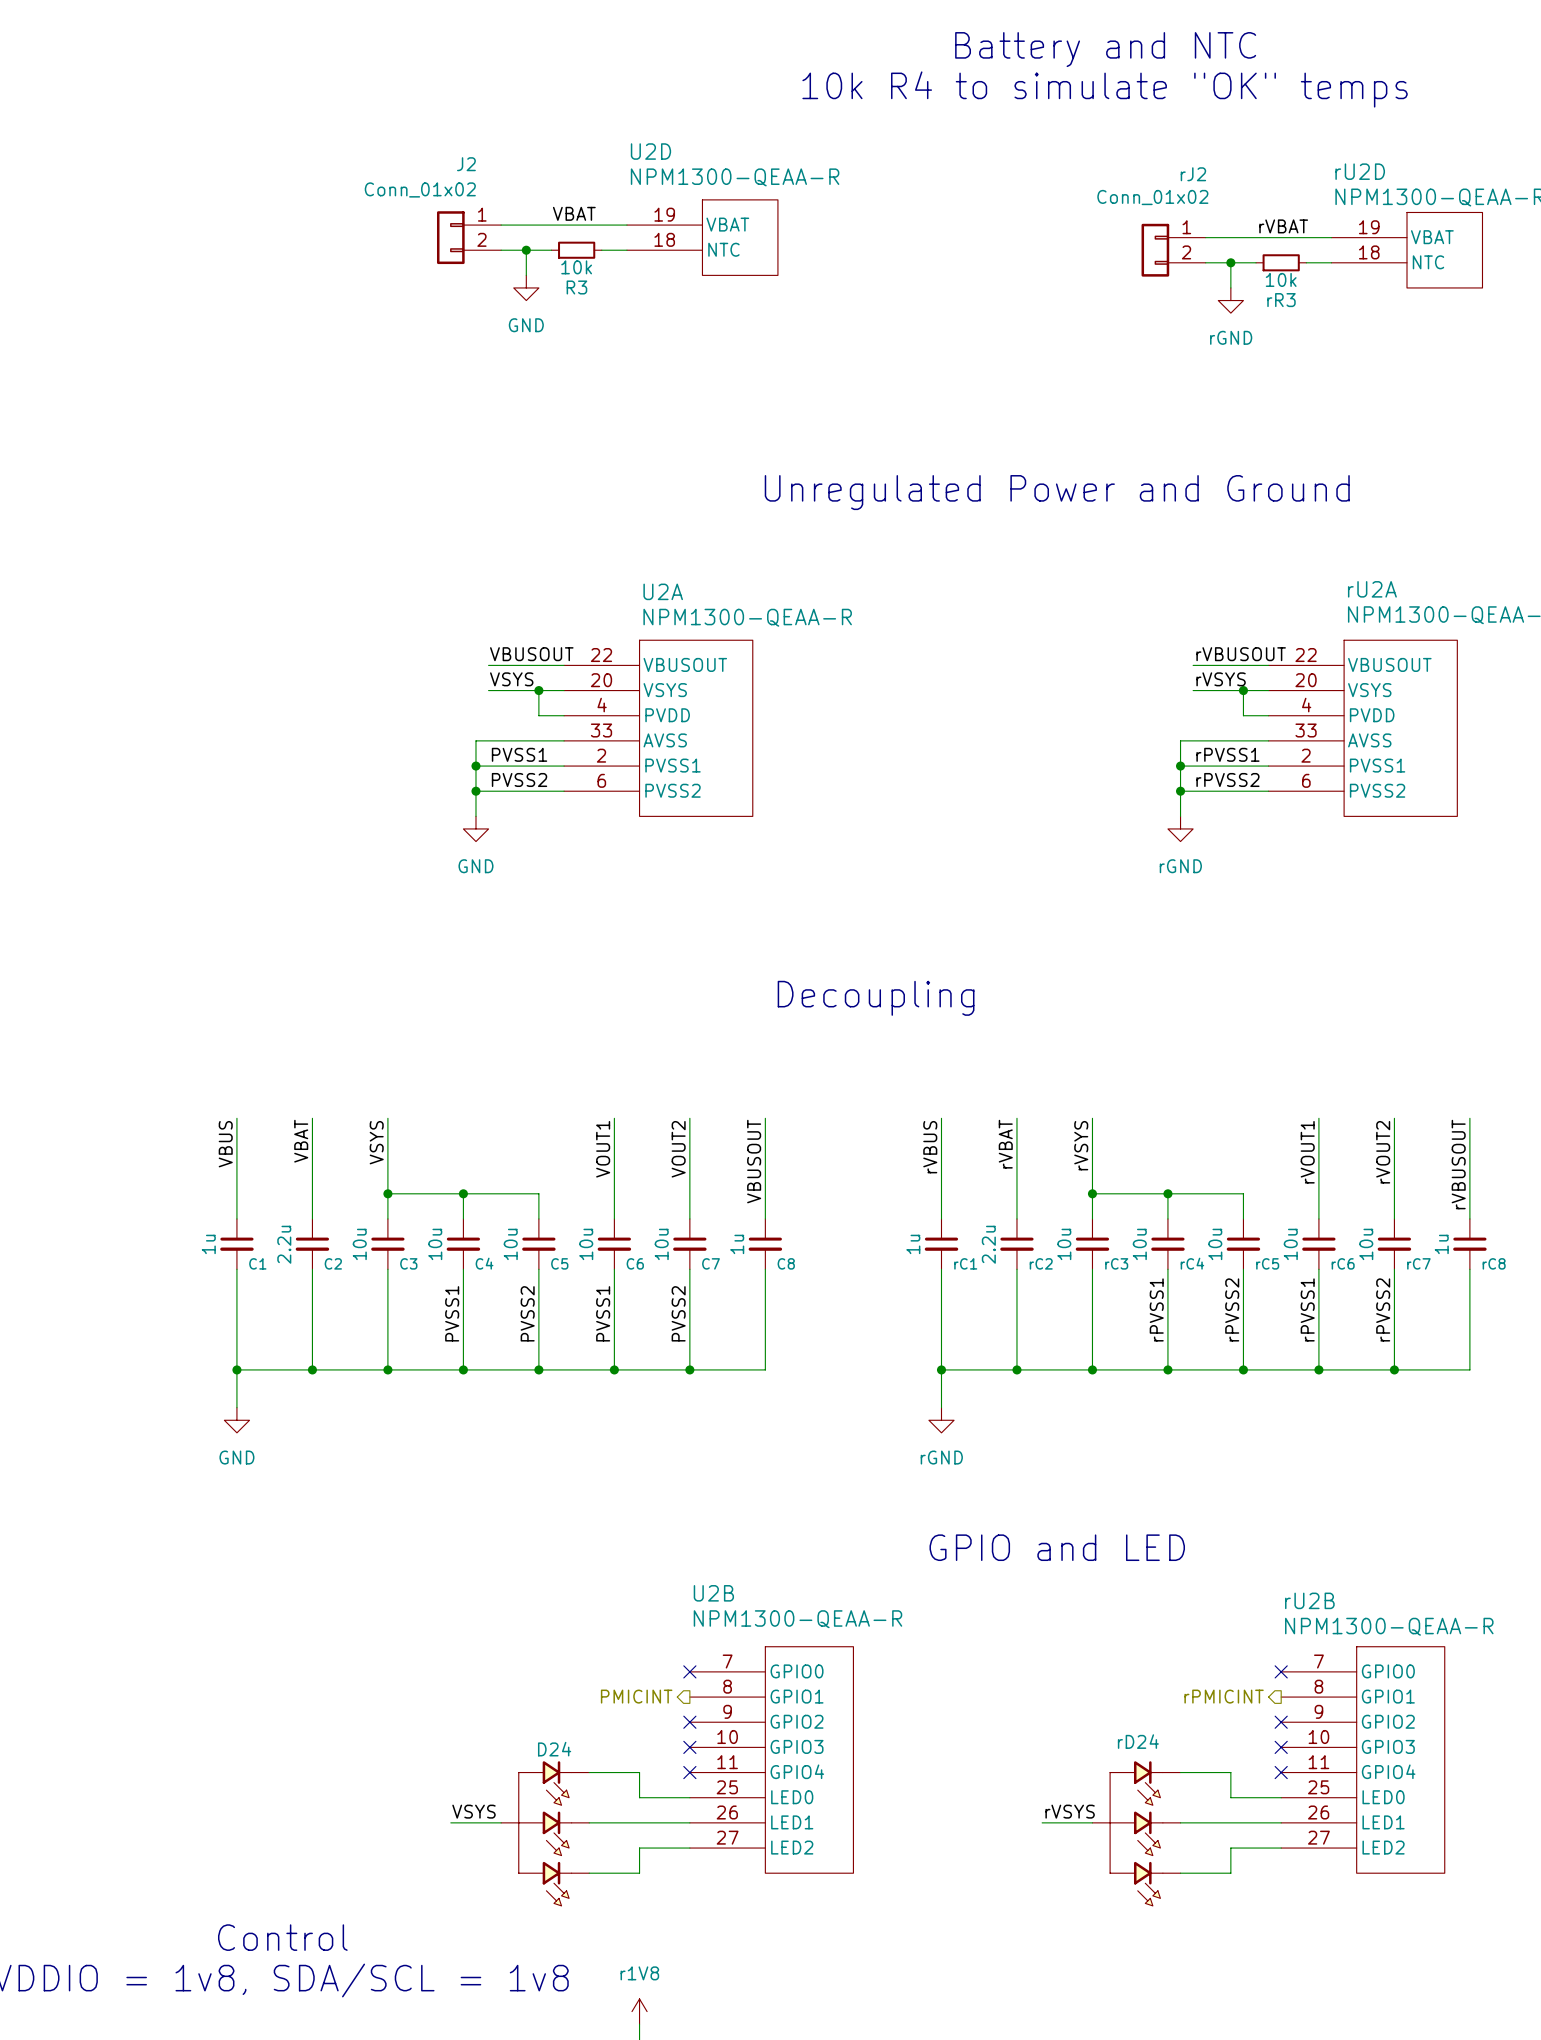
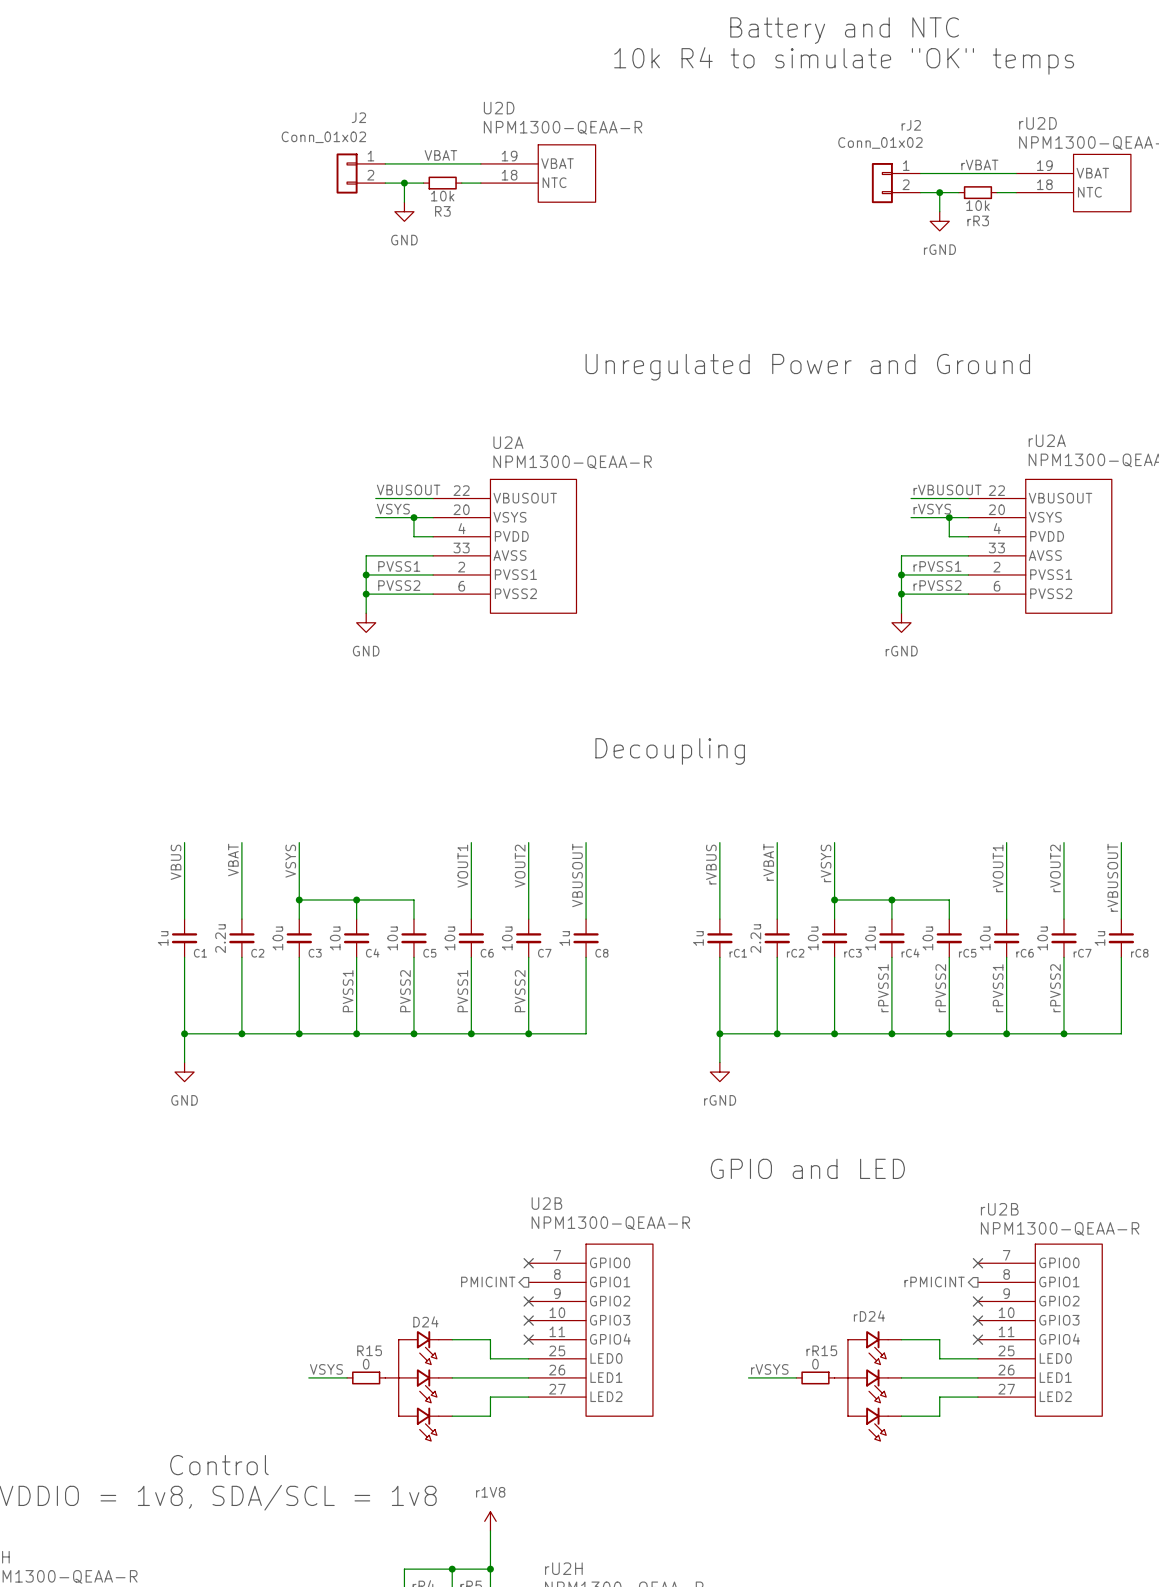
label position: VSYS (473, 1811) -> VSYS (326, 1369)
label position: rVSYS (1070, 1811) -> rVSYS (769, 1369)
wire: (450, 1822) (501, 1822) -> (347, 1377) (308, 1377)
R15: none -> 0 (366, 1377)
wire: (1042, 1822) (1092, 1822) -> (796, 1377) (748, 1377)
rR15: none -> 0 (815, 1377)

